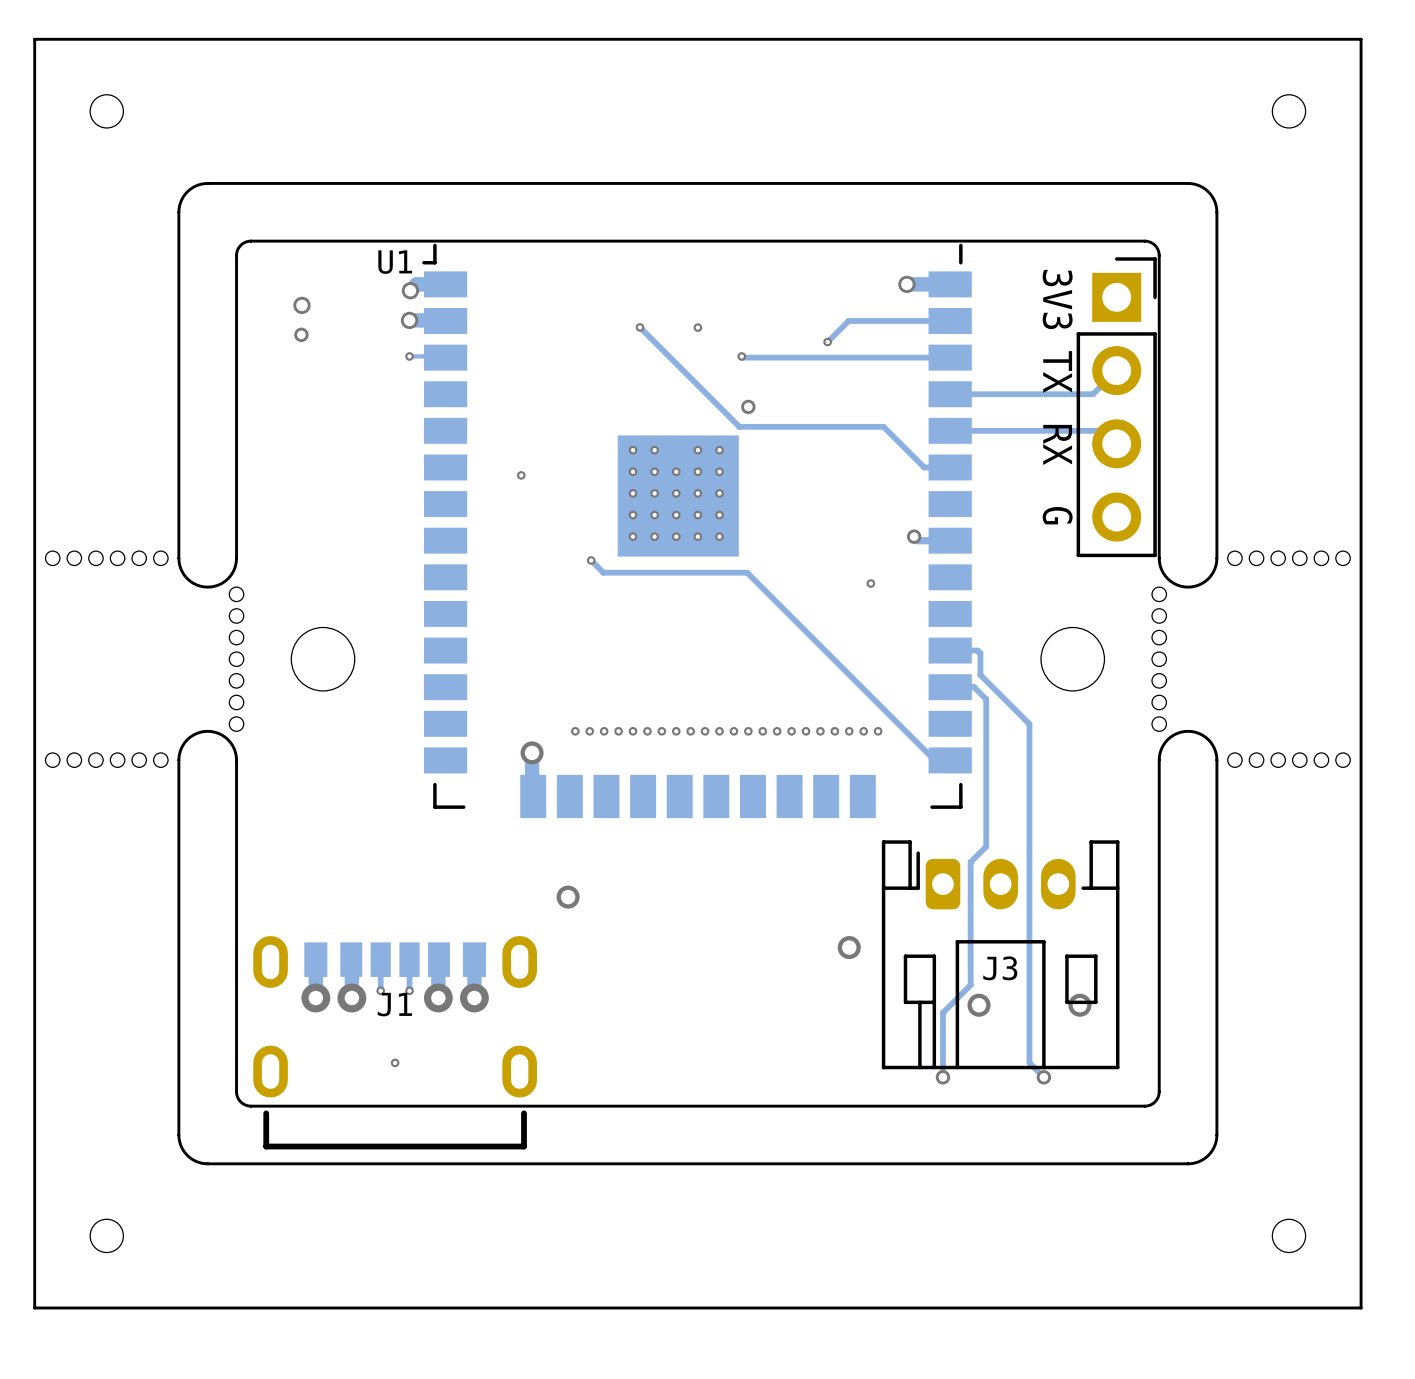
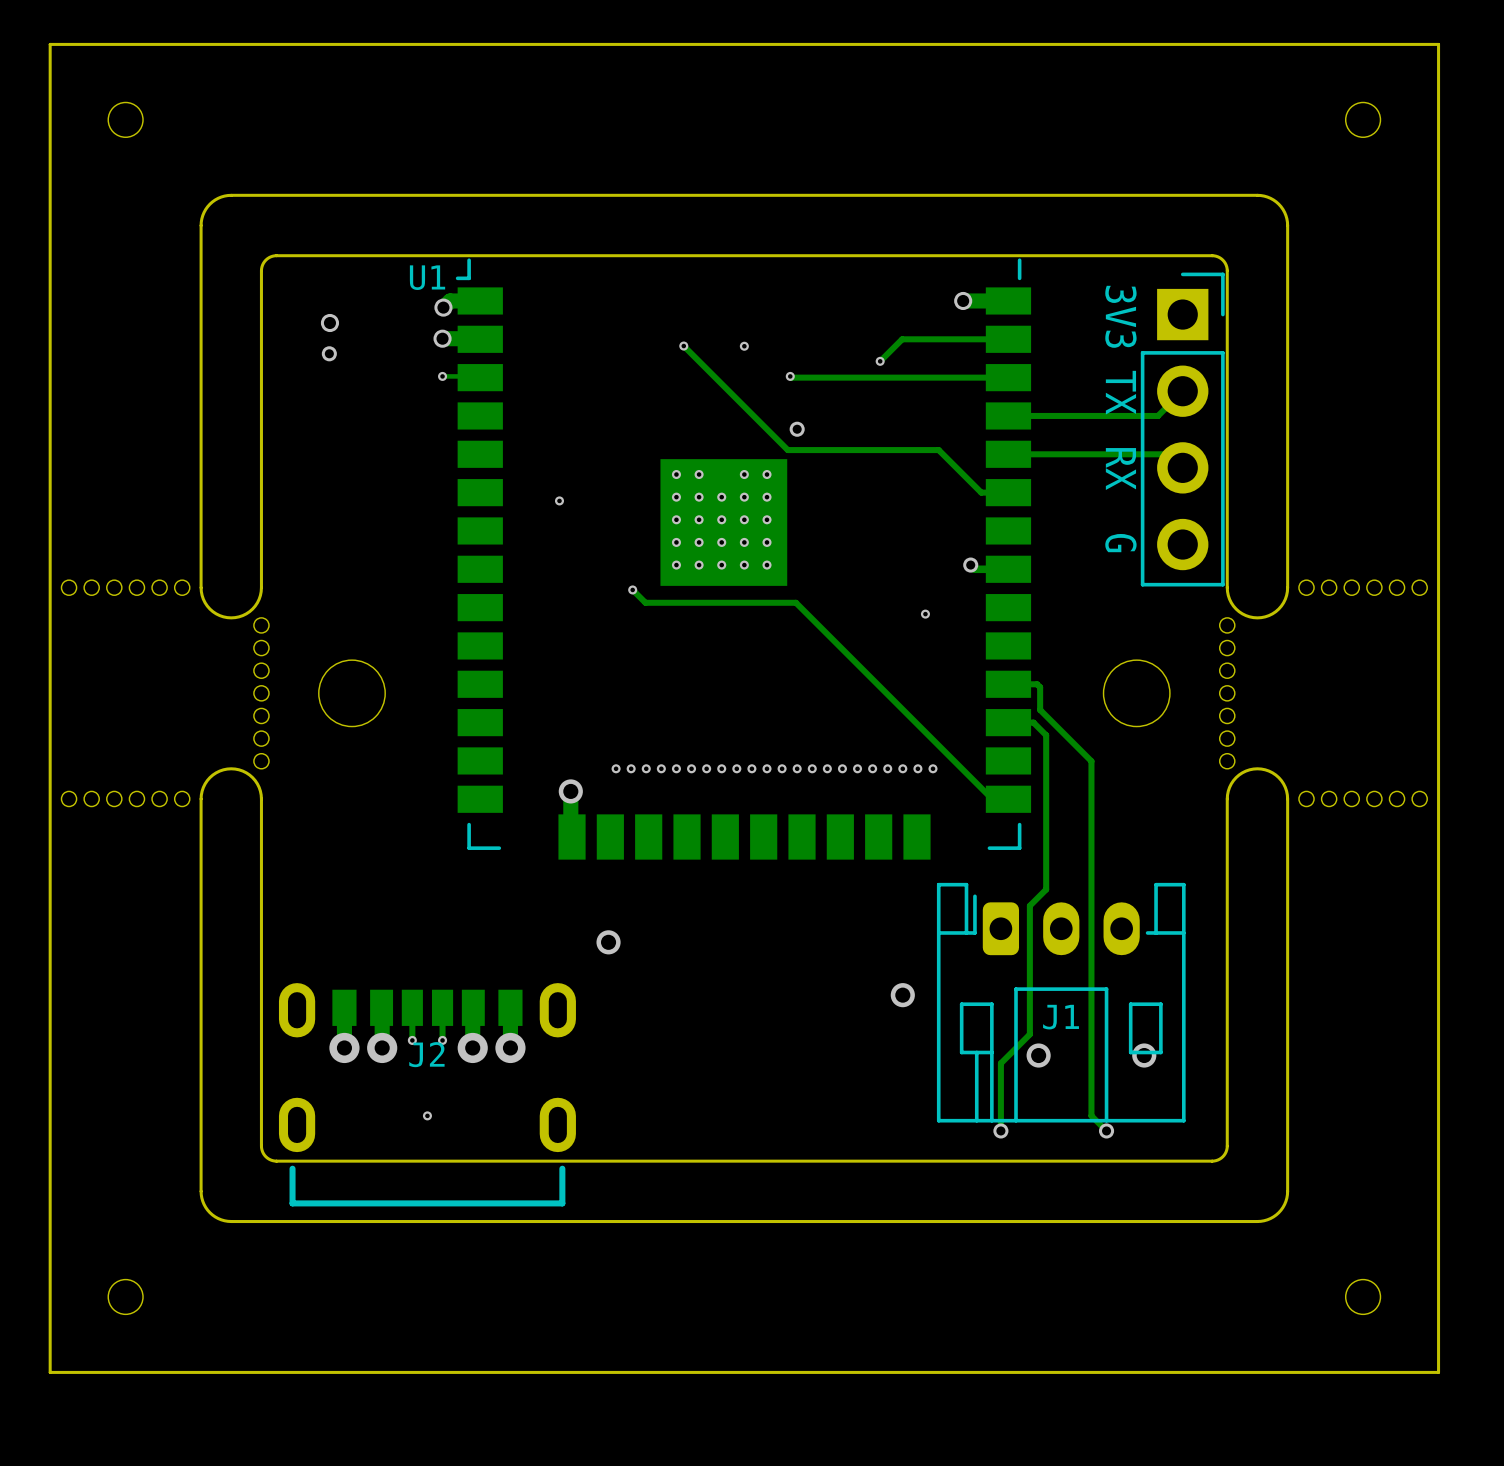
J3 name: J3 (1000, 968) -> J1 (1061, 1017)
J1 name: J1 (394, 1004) -> J2 (426, 1054)

